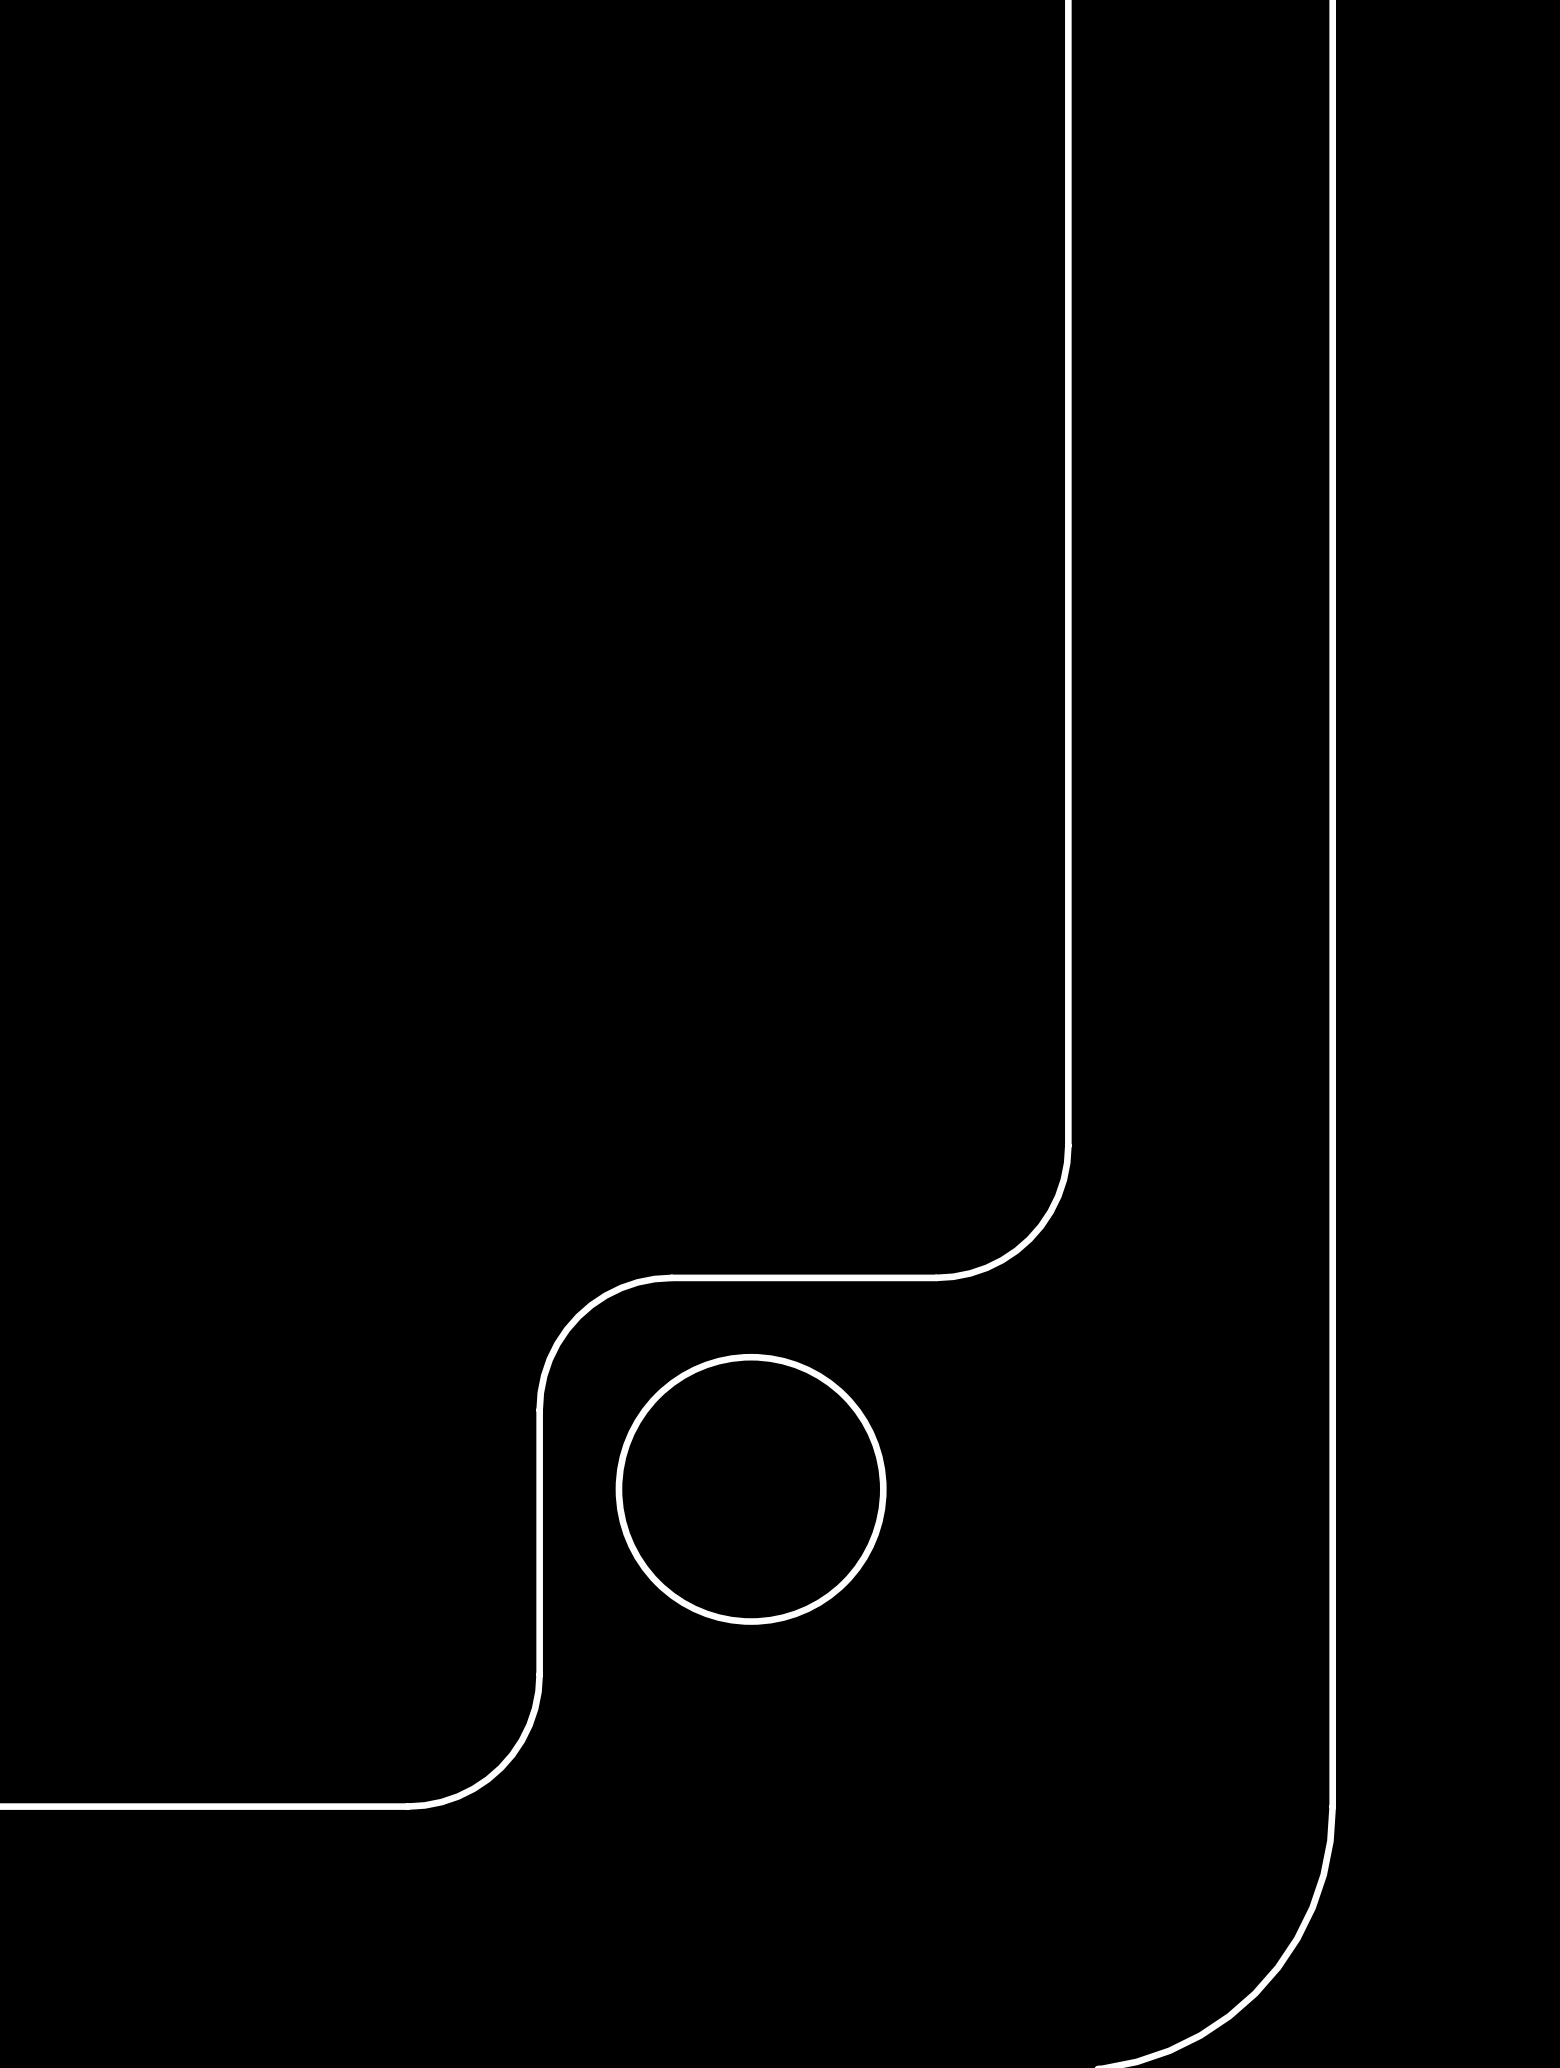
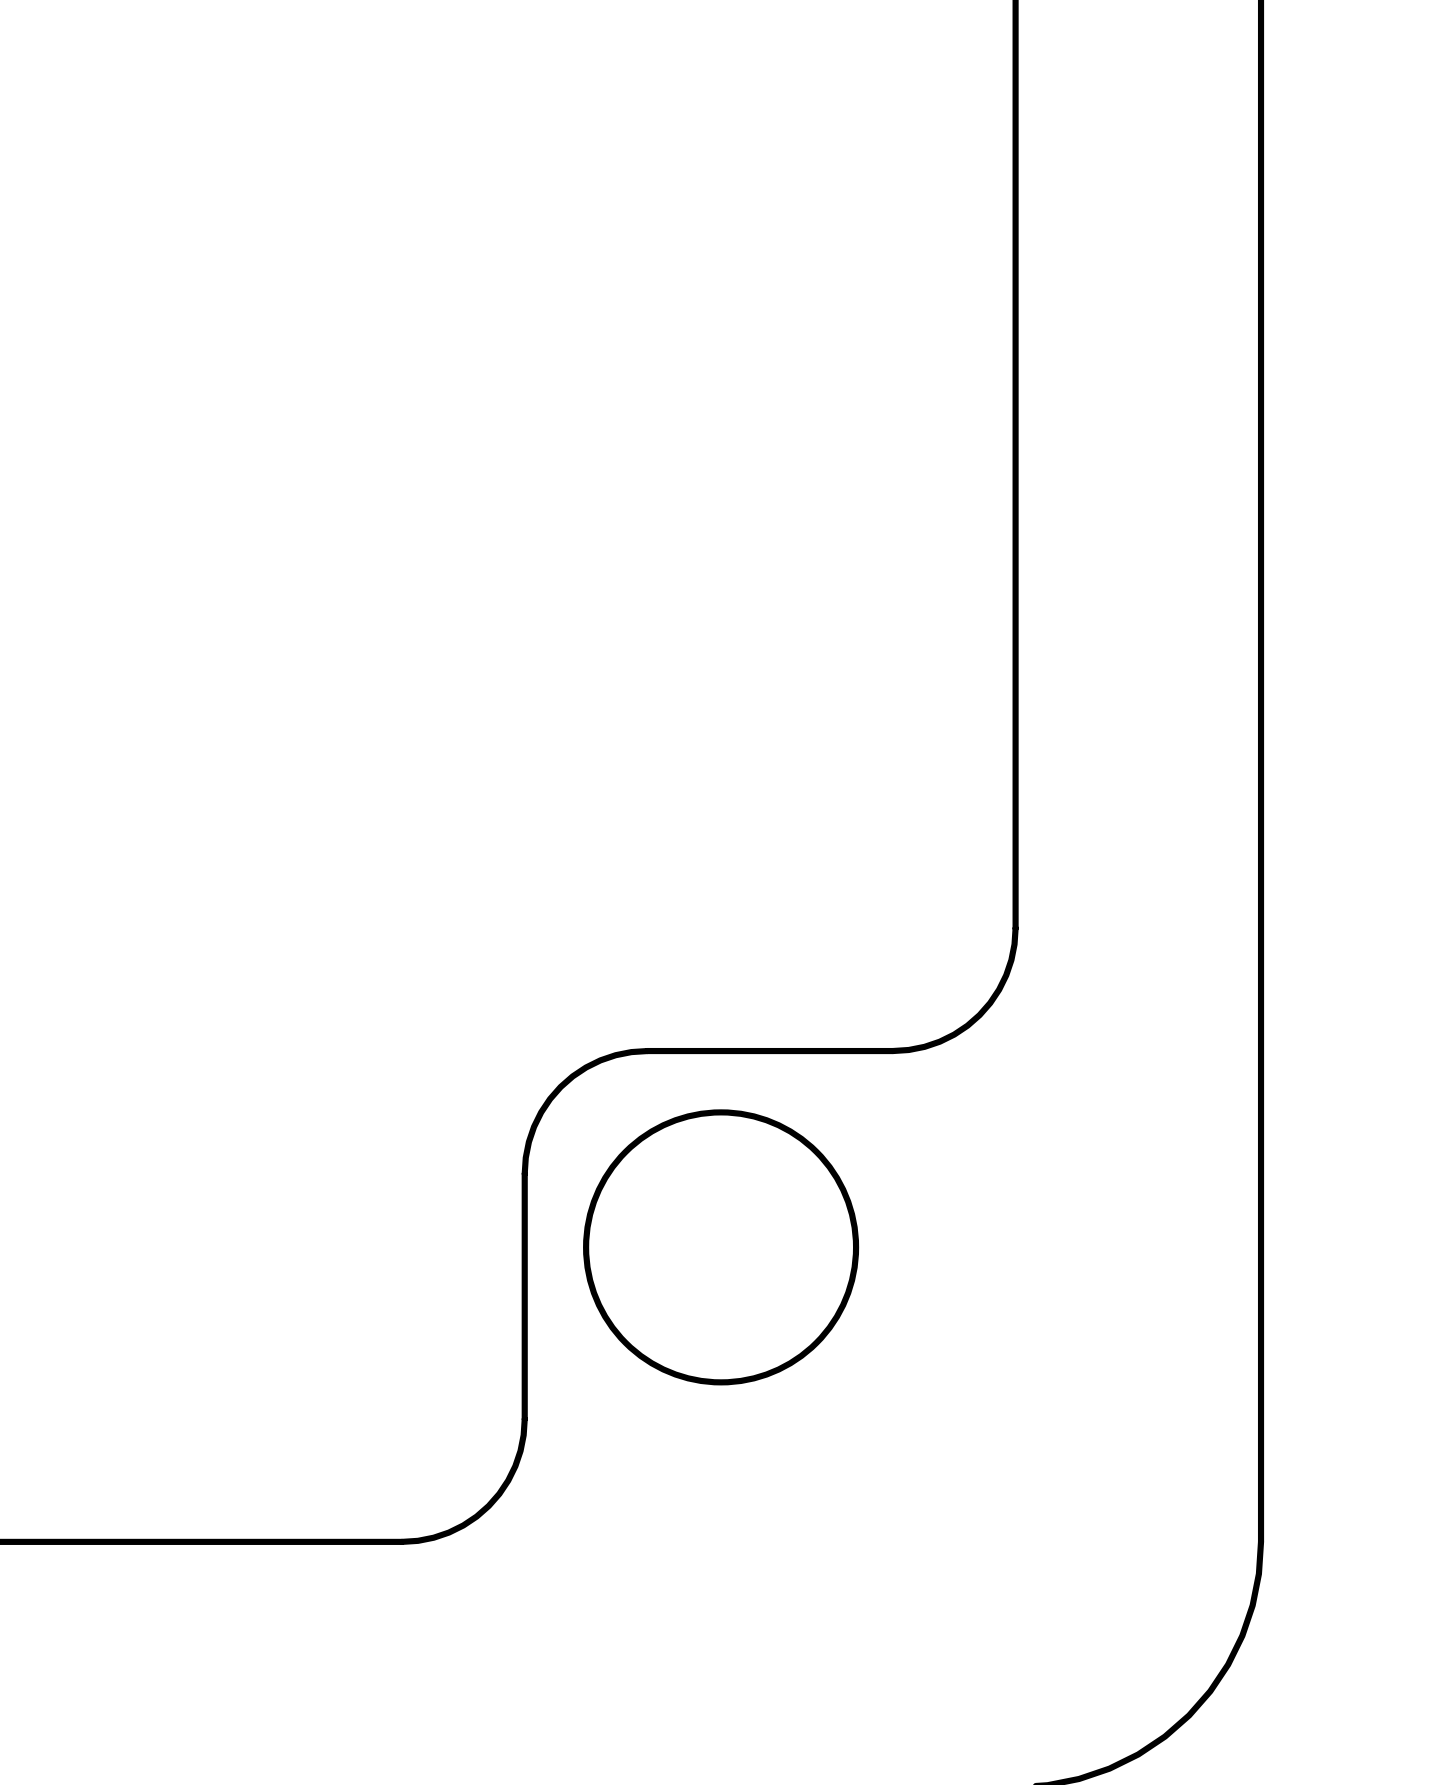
round board edge size: [615, 1353, 887, 1625] -> [583, 1109, 860, 1386]

